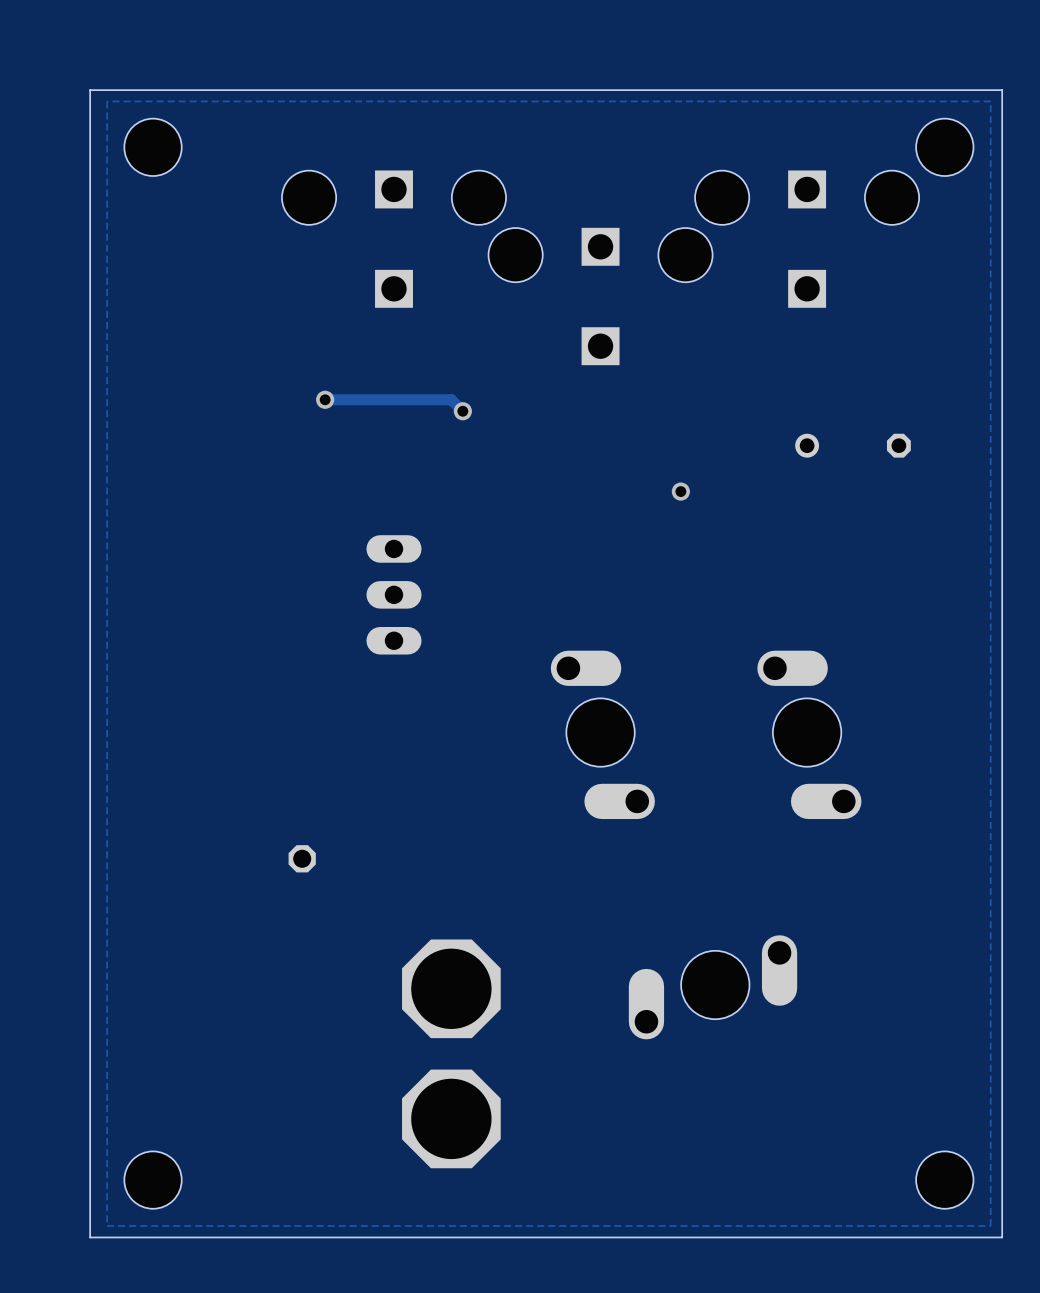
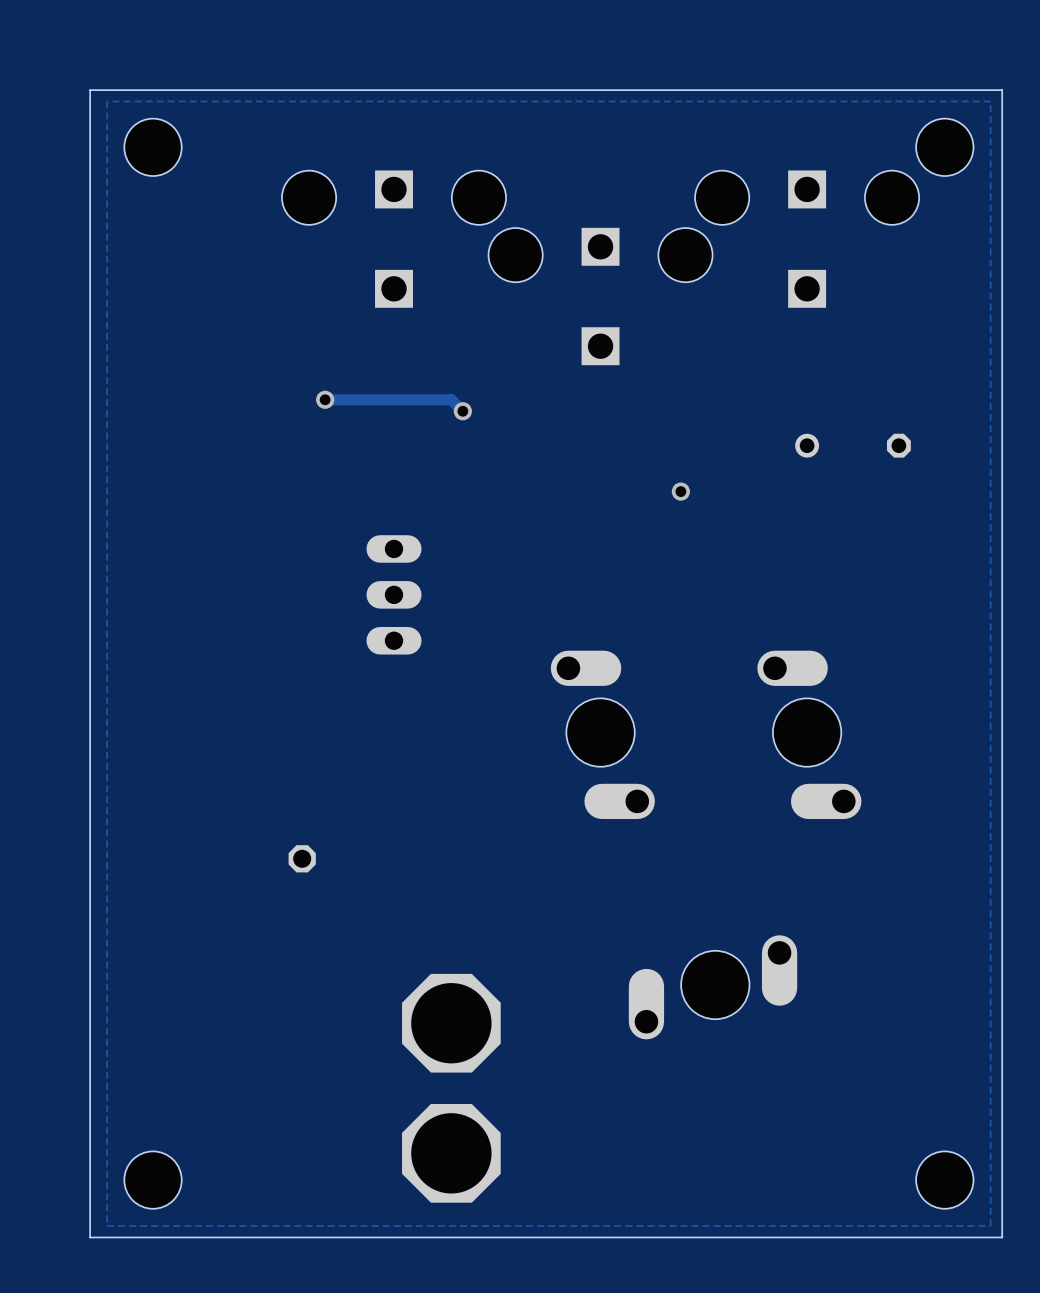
part position: (451, 1053) -> (451, 1088)

